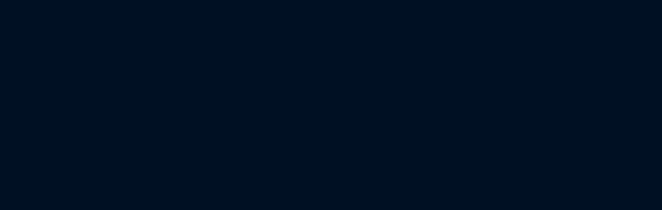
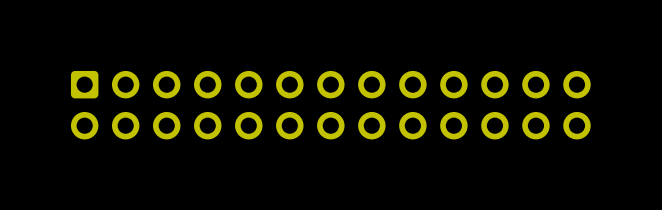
part: none -> (330, 105)

